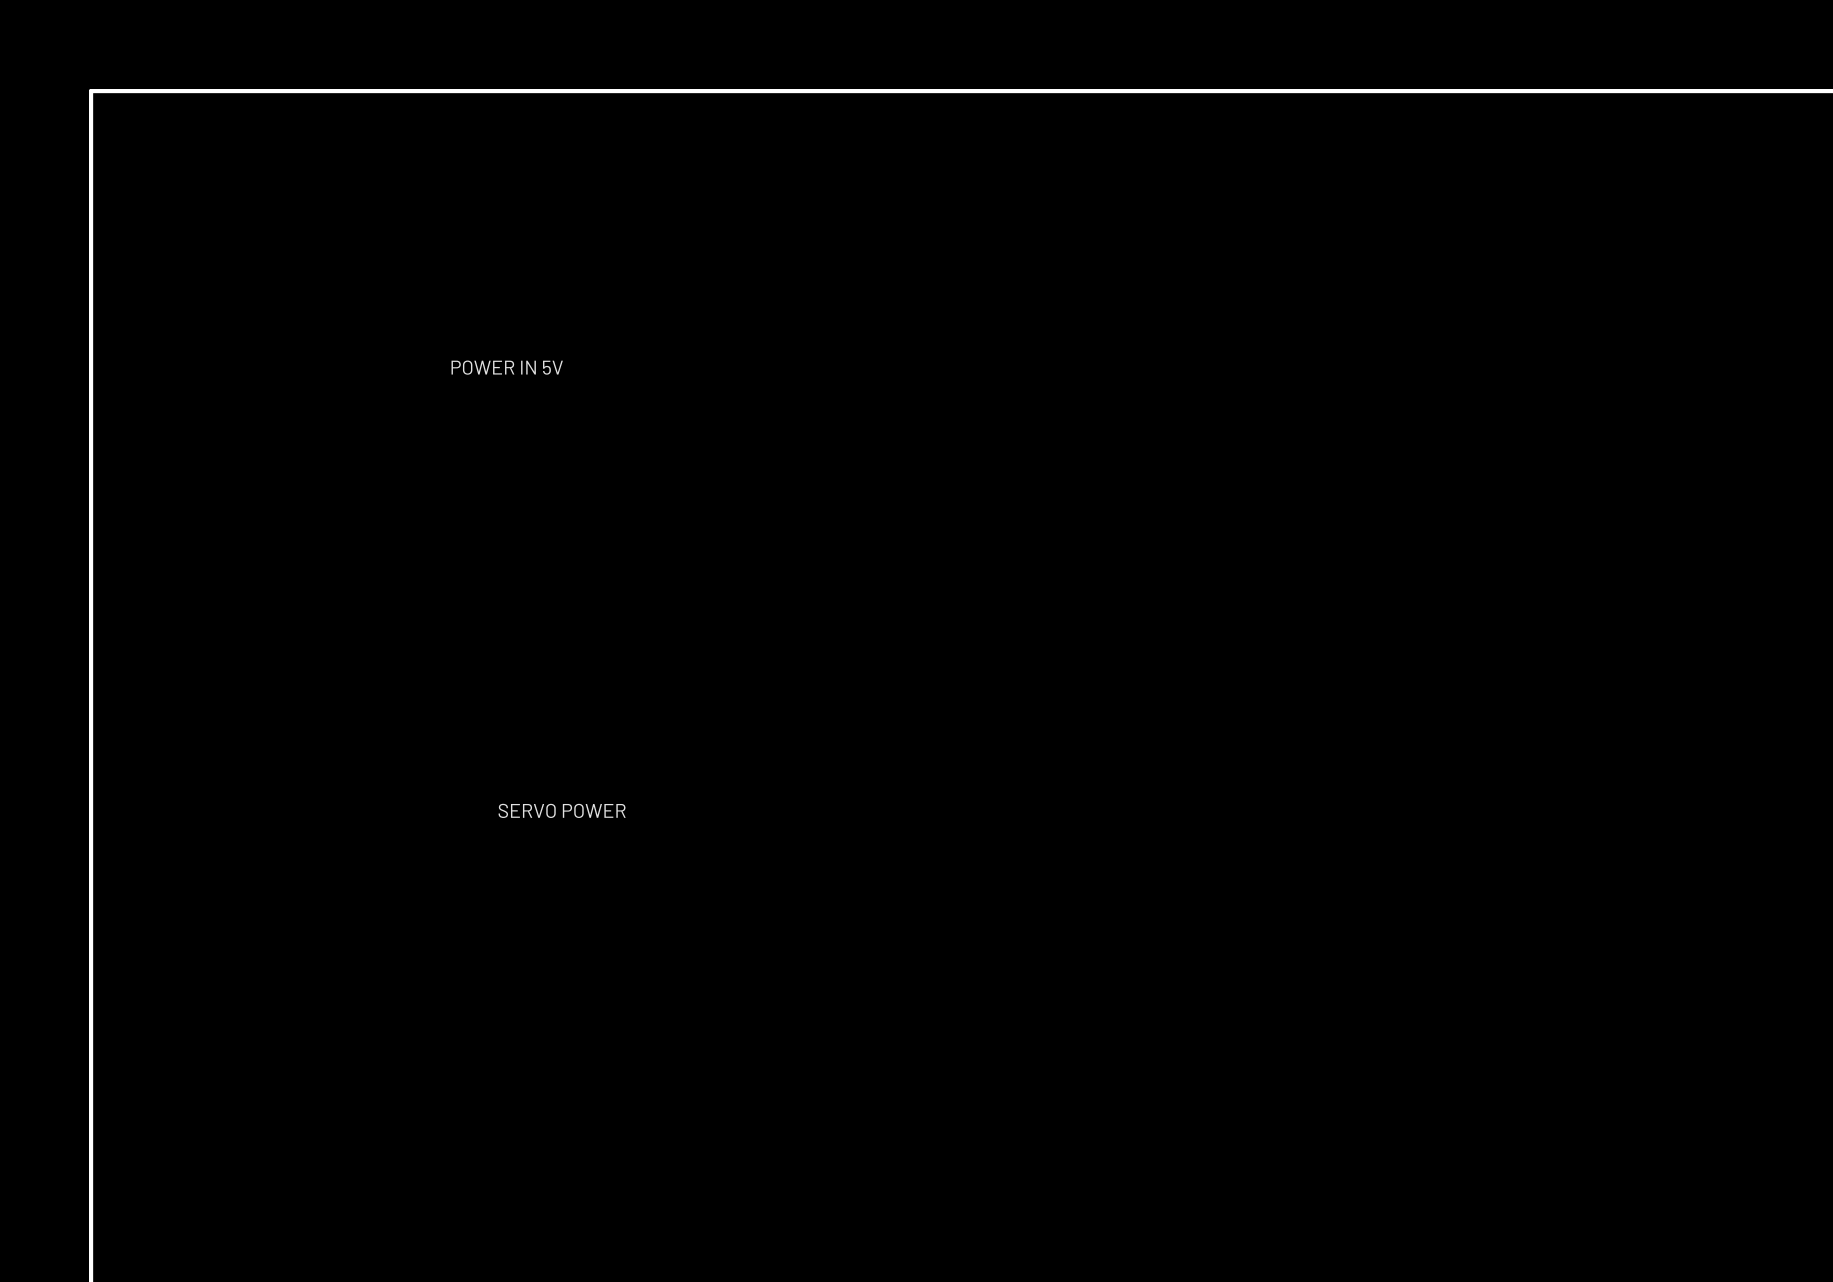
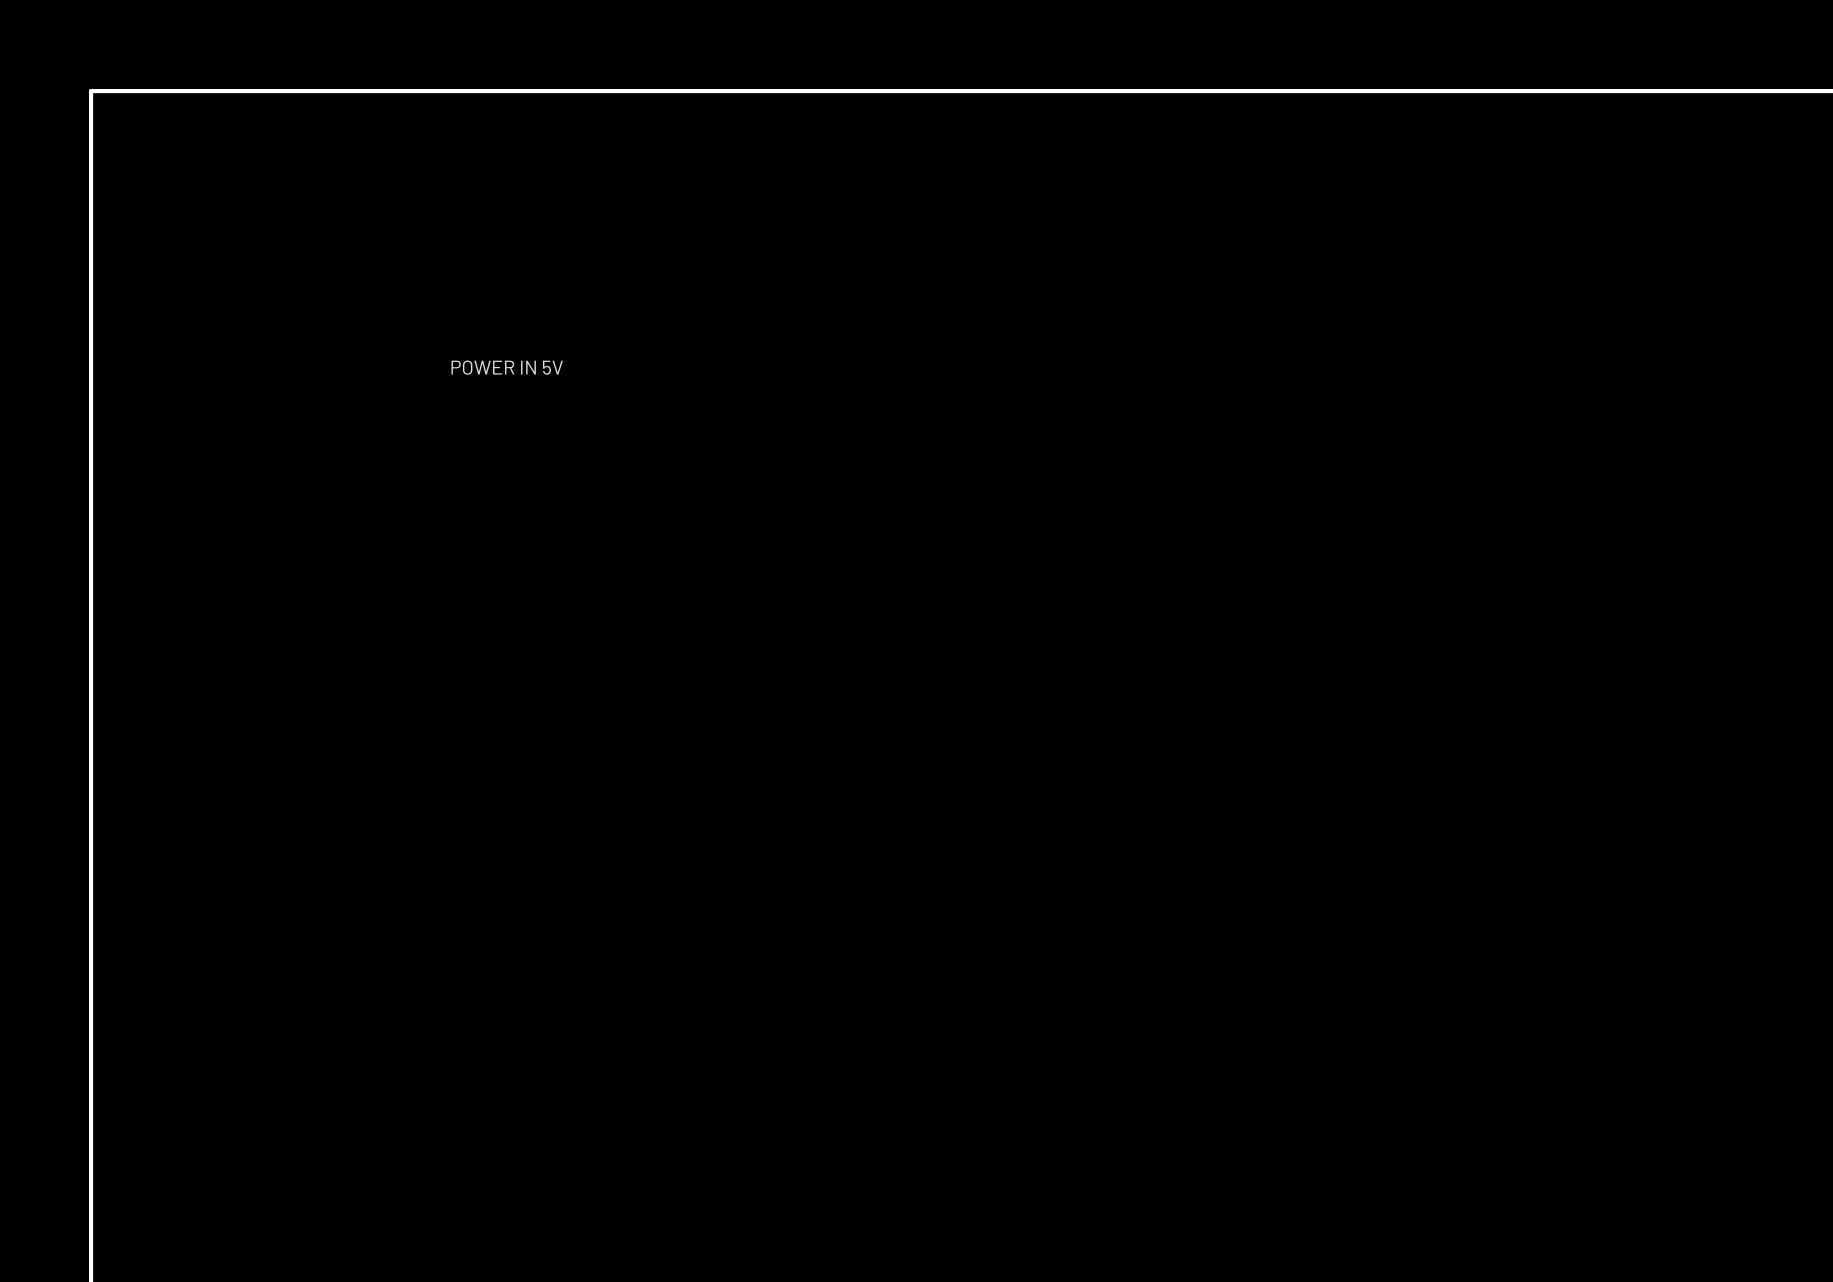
text: SERVO POWER (562, 810) -> none

